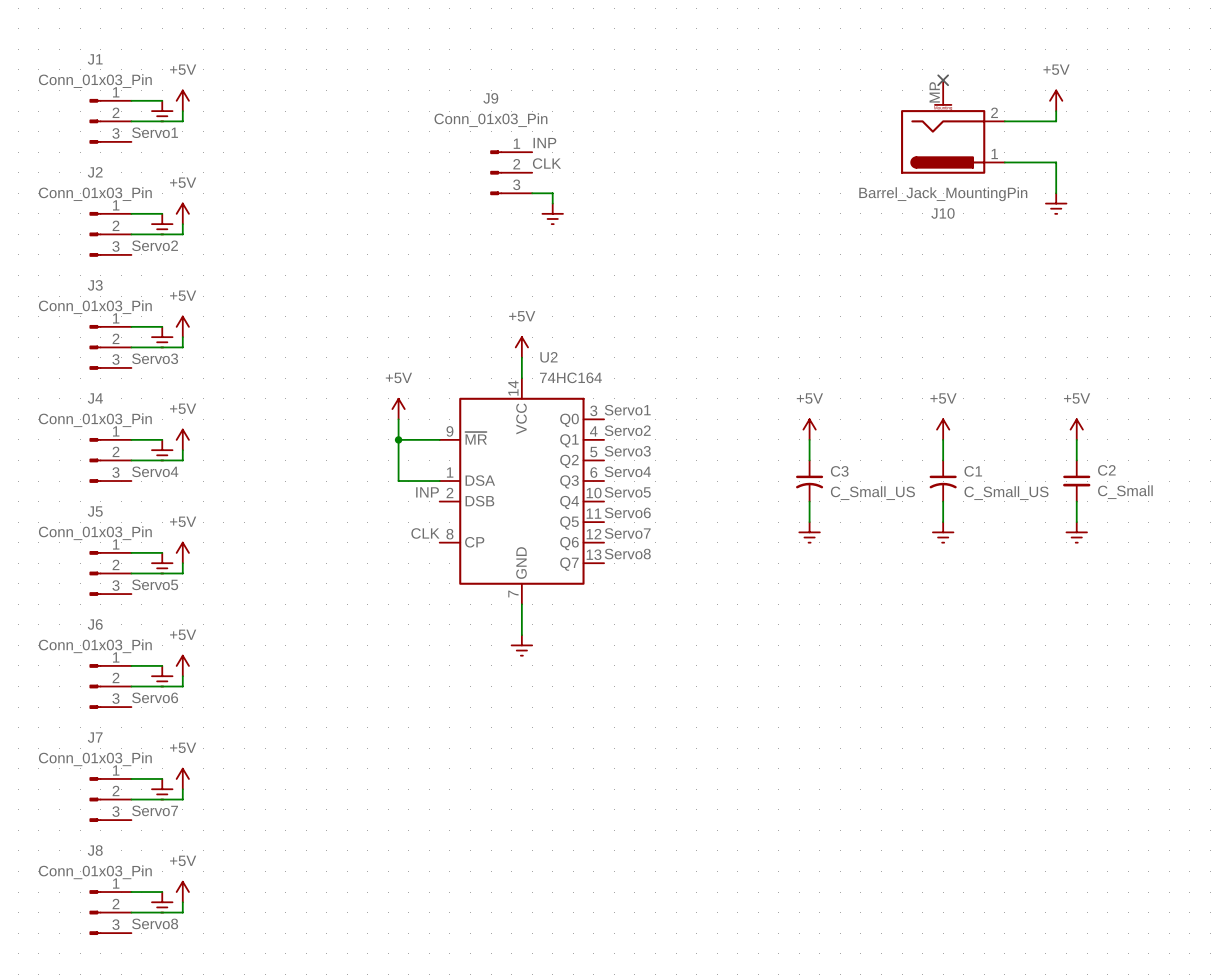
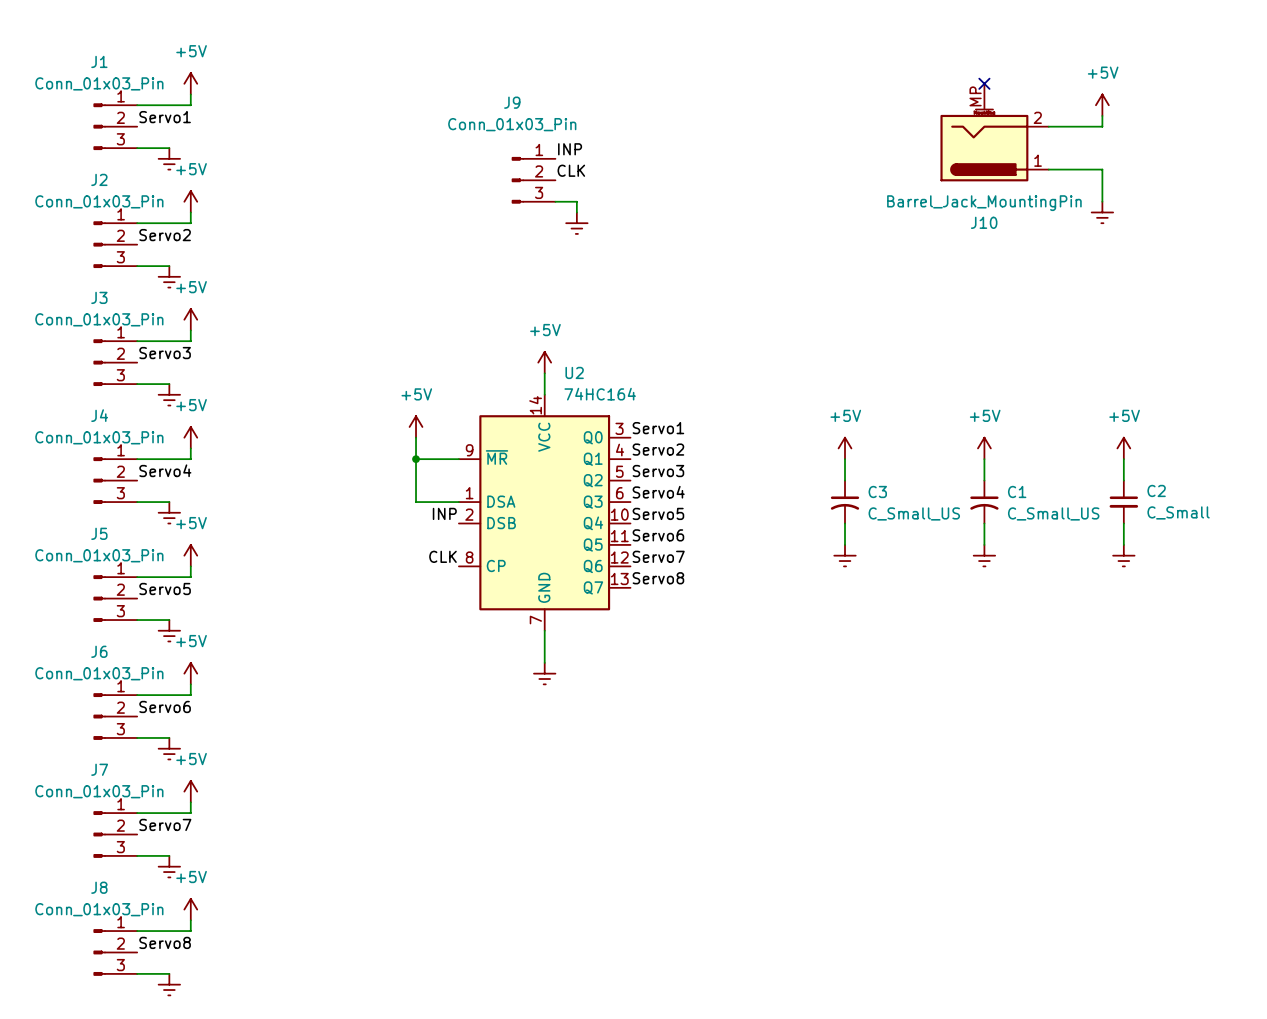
wire: none -> (190, 94) (190, 105) (169, 105)
power symbol position: +5V (182, 100) -> +5V (190, 83)
power symbol: (162, 111) -> none
wire: (182, 111) (182, 121) (131, 121) -> none
label position: Servo1 (155, 132) -> Servo1 (165, 117)
wire: none -> (137, 148) (169, 148)
power symbol: none -> (169, 158)
wire: none -> (190, 212) (190, 223) (169, 223)
power symbol position: +5V (182, 213) -> +5V (190, 201)
power symbol: (162, 224) -> none
wire: (182, 224) (182, 234) (131, 234) -> none
label position: Servo2 (155, 245) -> Servo2 (165, 235)
wire: none -> (137, 266) (169, 266)
power symbol: none -> (169, 276)
wire: none -> (190, 330) (190, 341) (169, 341)
power symbol position: +5V (182, 326) -> +5V (190, 319)
power symbol: (162, 337) -> none
wire: (182, 337) (182, 347) (131, 347) -> none
label position: Servo3 (155, 358) -> Servo3 (165, 353)
wire: none -> (137, 384) (169, 384)
power symbol: none -> (169, 394)
wire: none -> (190, 448) (190, 459) (169, 459)
power symbol position: +5V (182, 439) -> +5V (190, 437)
power symbol: (162, 450) -> none
wire: (182, 450) (182, 460) (131, 460) -> none
label position: Servo4 (155, 471) -> Servo4 (165, 470)
wire: none -> (137, 502) (169, 502)
power symbol: none -> (169, 512)
wire: none -> (190, 566) (190, 577) (169, 577)
power symbol position: +5V (182, 552) -> +5V (190, 555)
power symbol: (162, 563) -> none
wire: (182, 563) (182, 573) (131, 573) -> none
label position: Servo5 (155, 584) -> Servo5 (165, 588)
wire: none -> (137, 620) (169, 620)
power symbol: none -> (169, 630)
wire: none -> (190, 684) (190, 695) (169, 695)
power symbol position: +5V (182, 665) -> +5V (190, 673)
power symbol: (162, 676) -> none
wire: (182, 676) (182, 686) (131, 686) -> none
label position: Servo6 (155, 697) -> Servo6 (165, 706)
wire: none -> (137, 737) (169, 737)
power symbol: none -> (169, 748)
wire: none -> (190, 802) (190, 813) (169, 813)
power symbol position: +5V (182, 778) -> +5V (190, 791)
power symbol: (162, 789) -> none
wire: (182, 789) (182, 799) (131, 799) -> none
label position: Servo7 (155, 810) -> Servo7 (165, 824)
wire: none -> (137, 855) (169, 855)
power symbol: none -> (169, 866)
wire: none -> (190, 920) (190, 931) (169, 931)
power symbol position: +5V (182, 892) -> +5V (190, 909)
power symbol: (162, 902) -> none
wire: (182, 902) (182, 912) (131, 912) -> none
label position: Servo8 (155, 923) -> Servo8 (165, 942)
wire: none -> (137, 973) (169, 973)
power symbol: none -> (169, 984)

